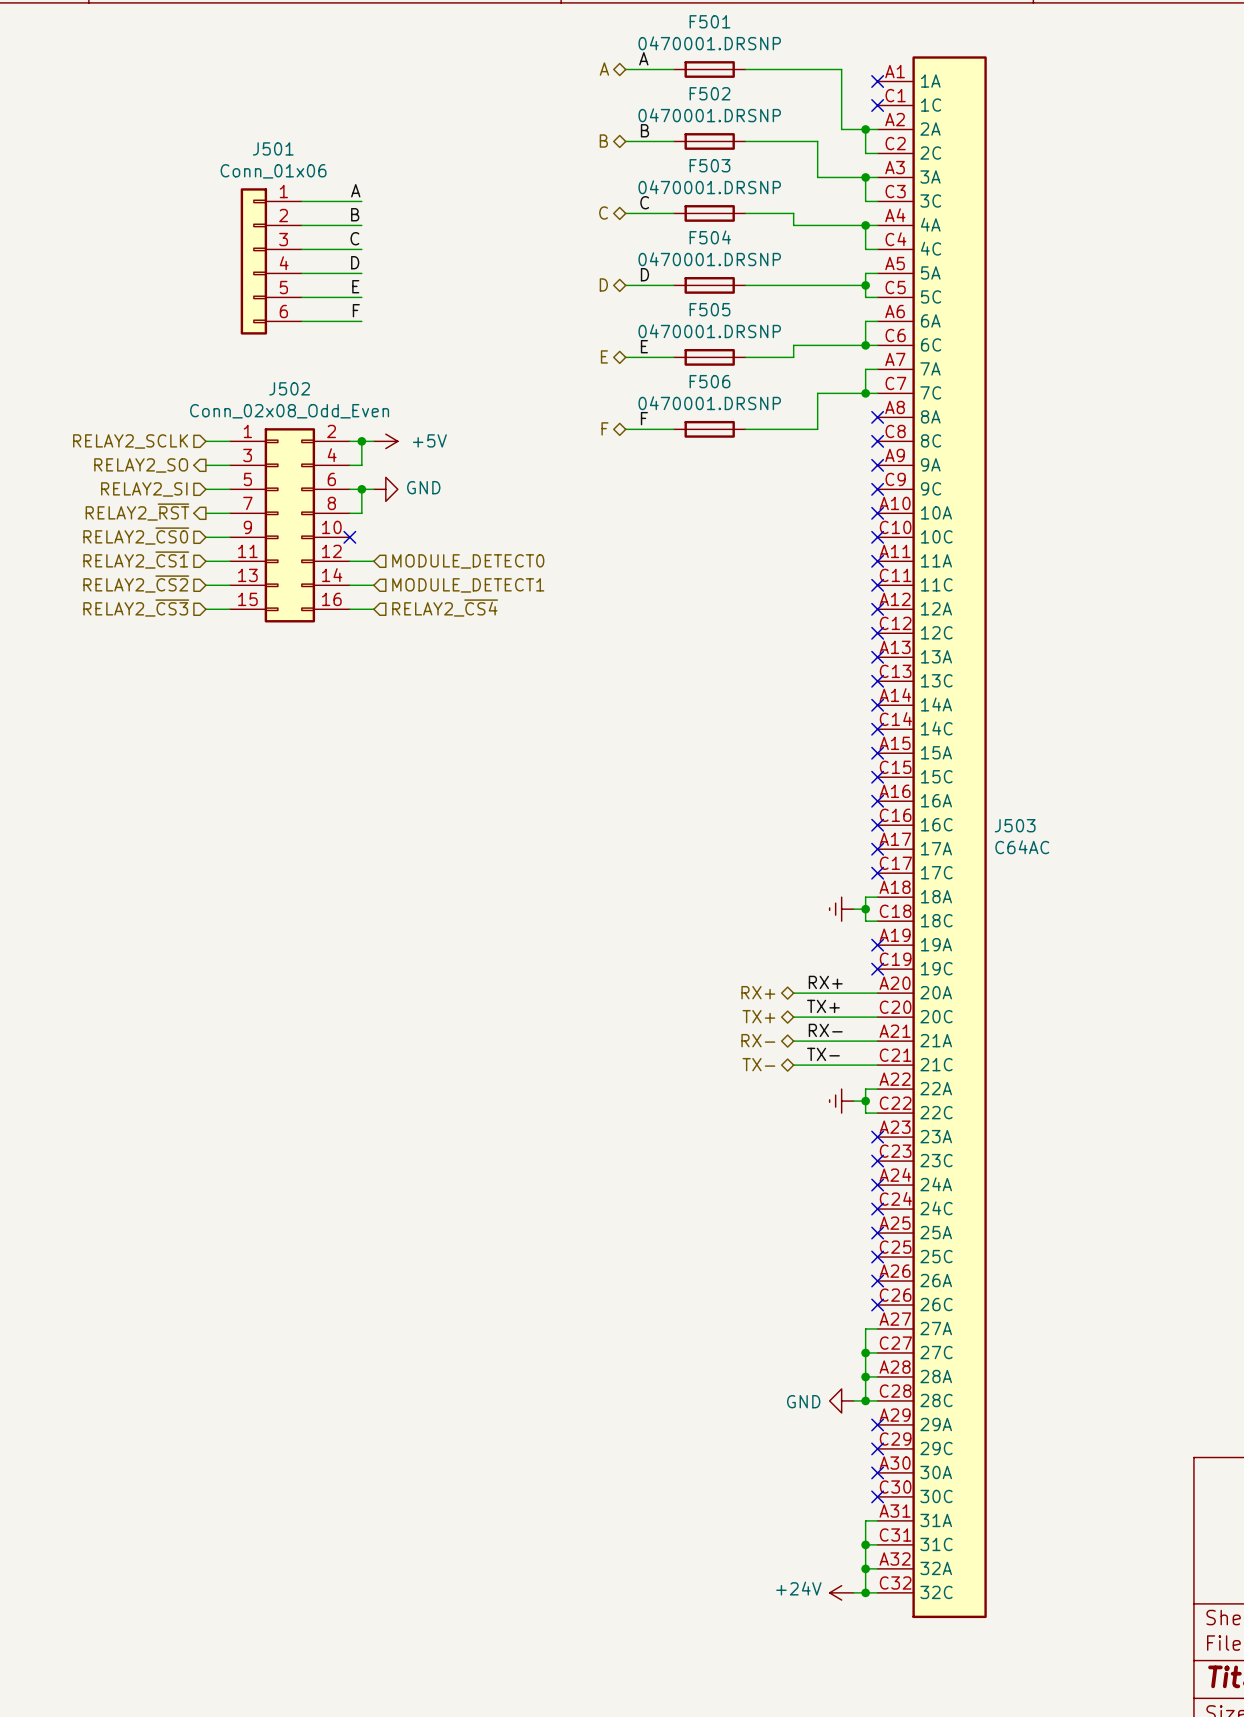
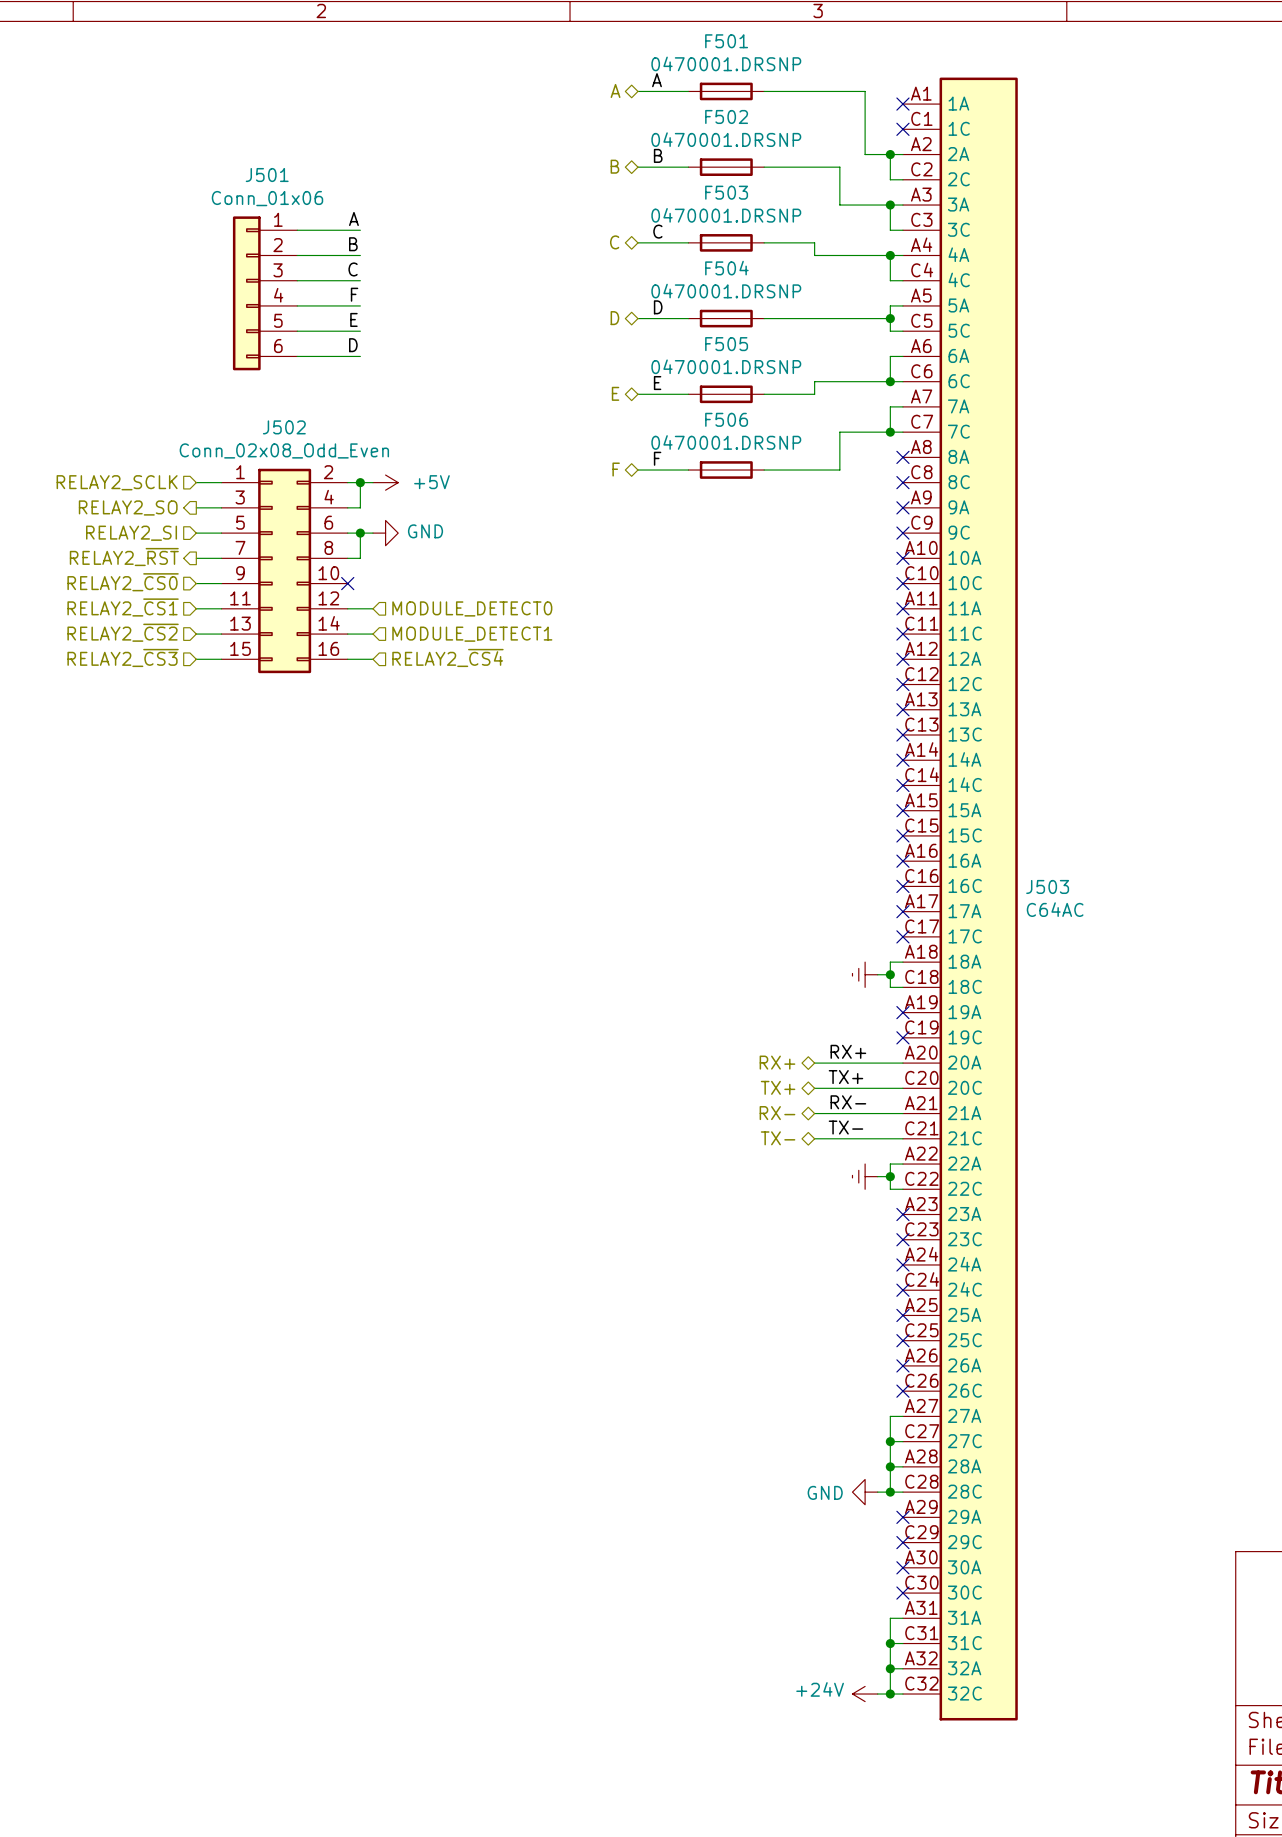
label: D (355, 262) -> F (354, 294)
label: F (356, 310) -> D (353, 345)

